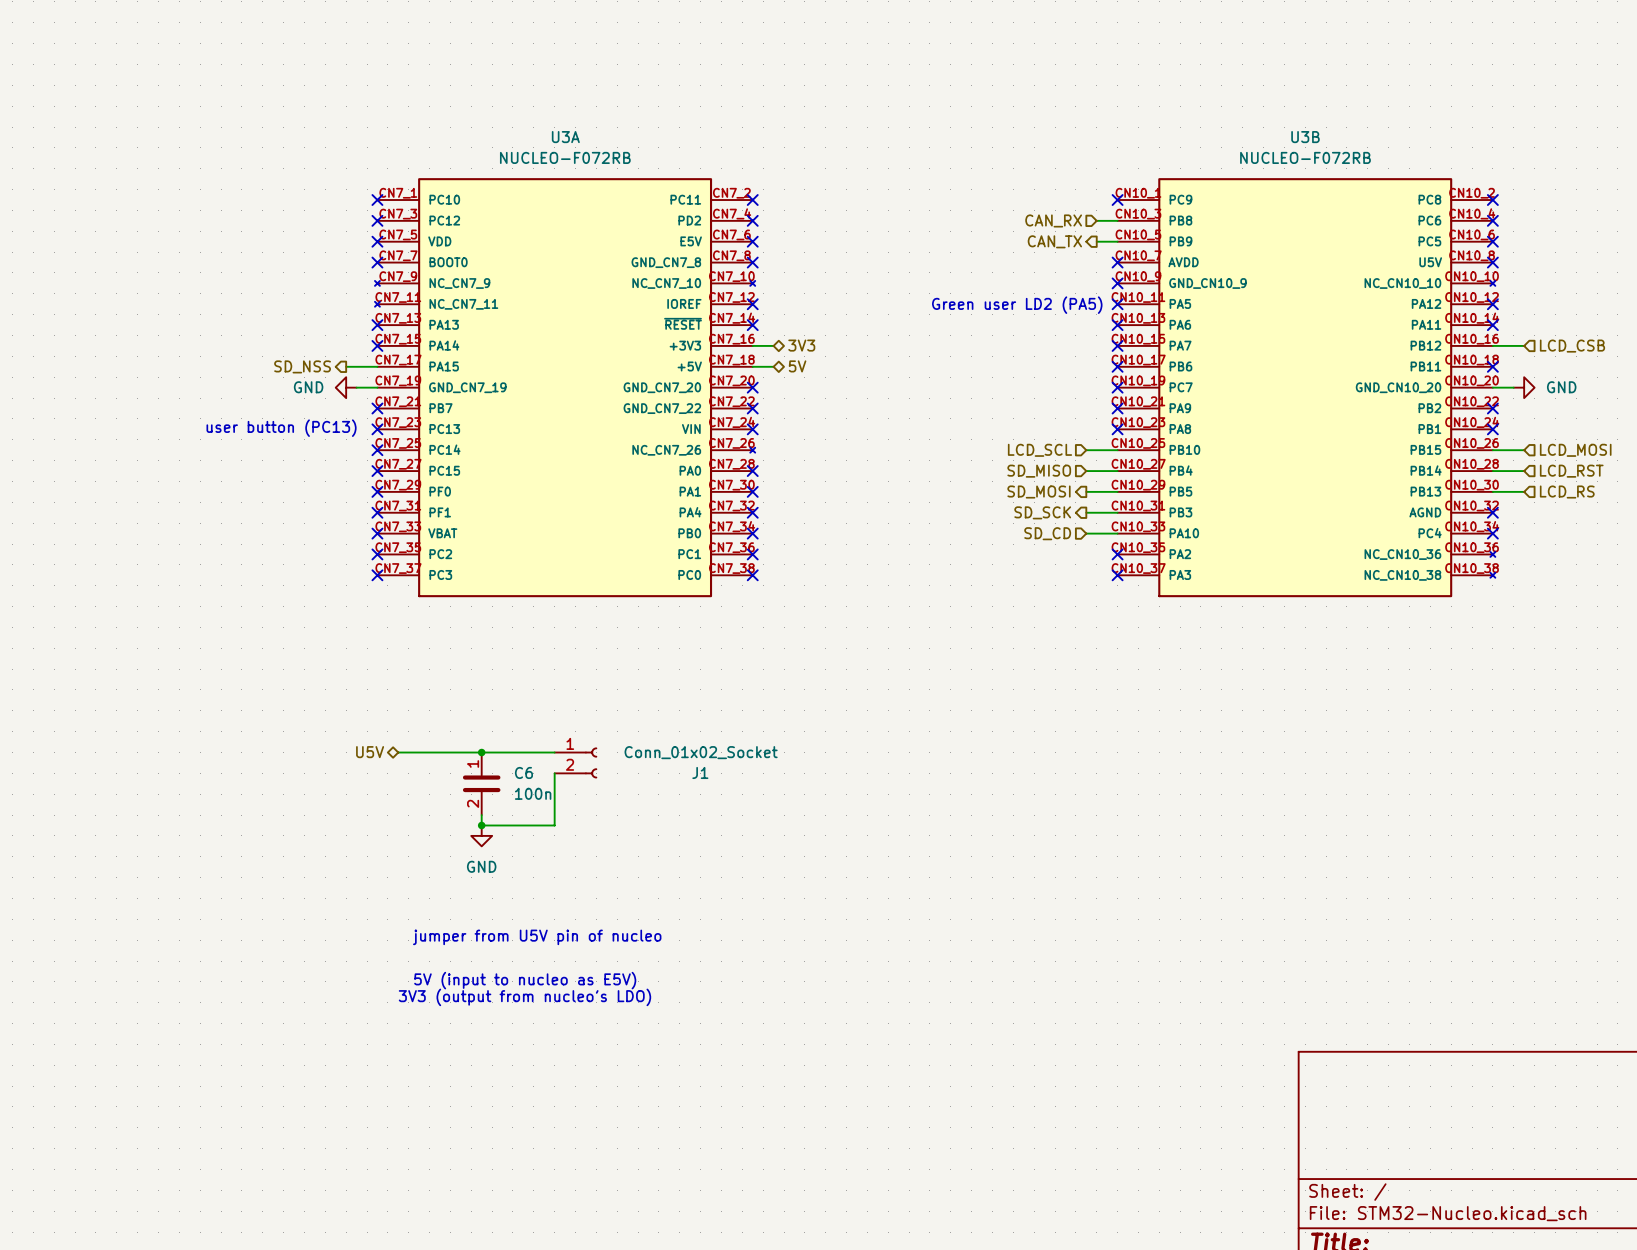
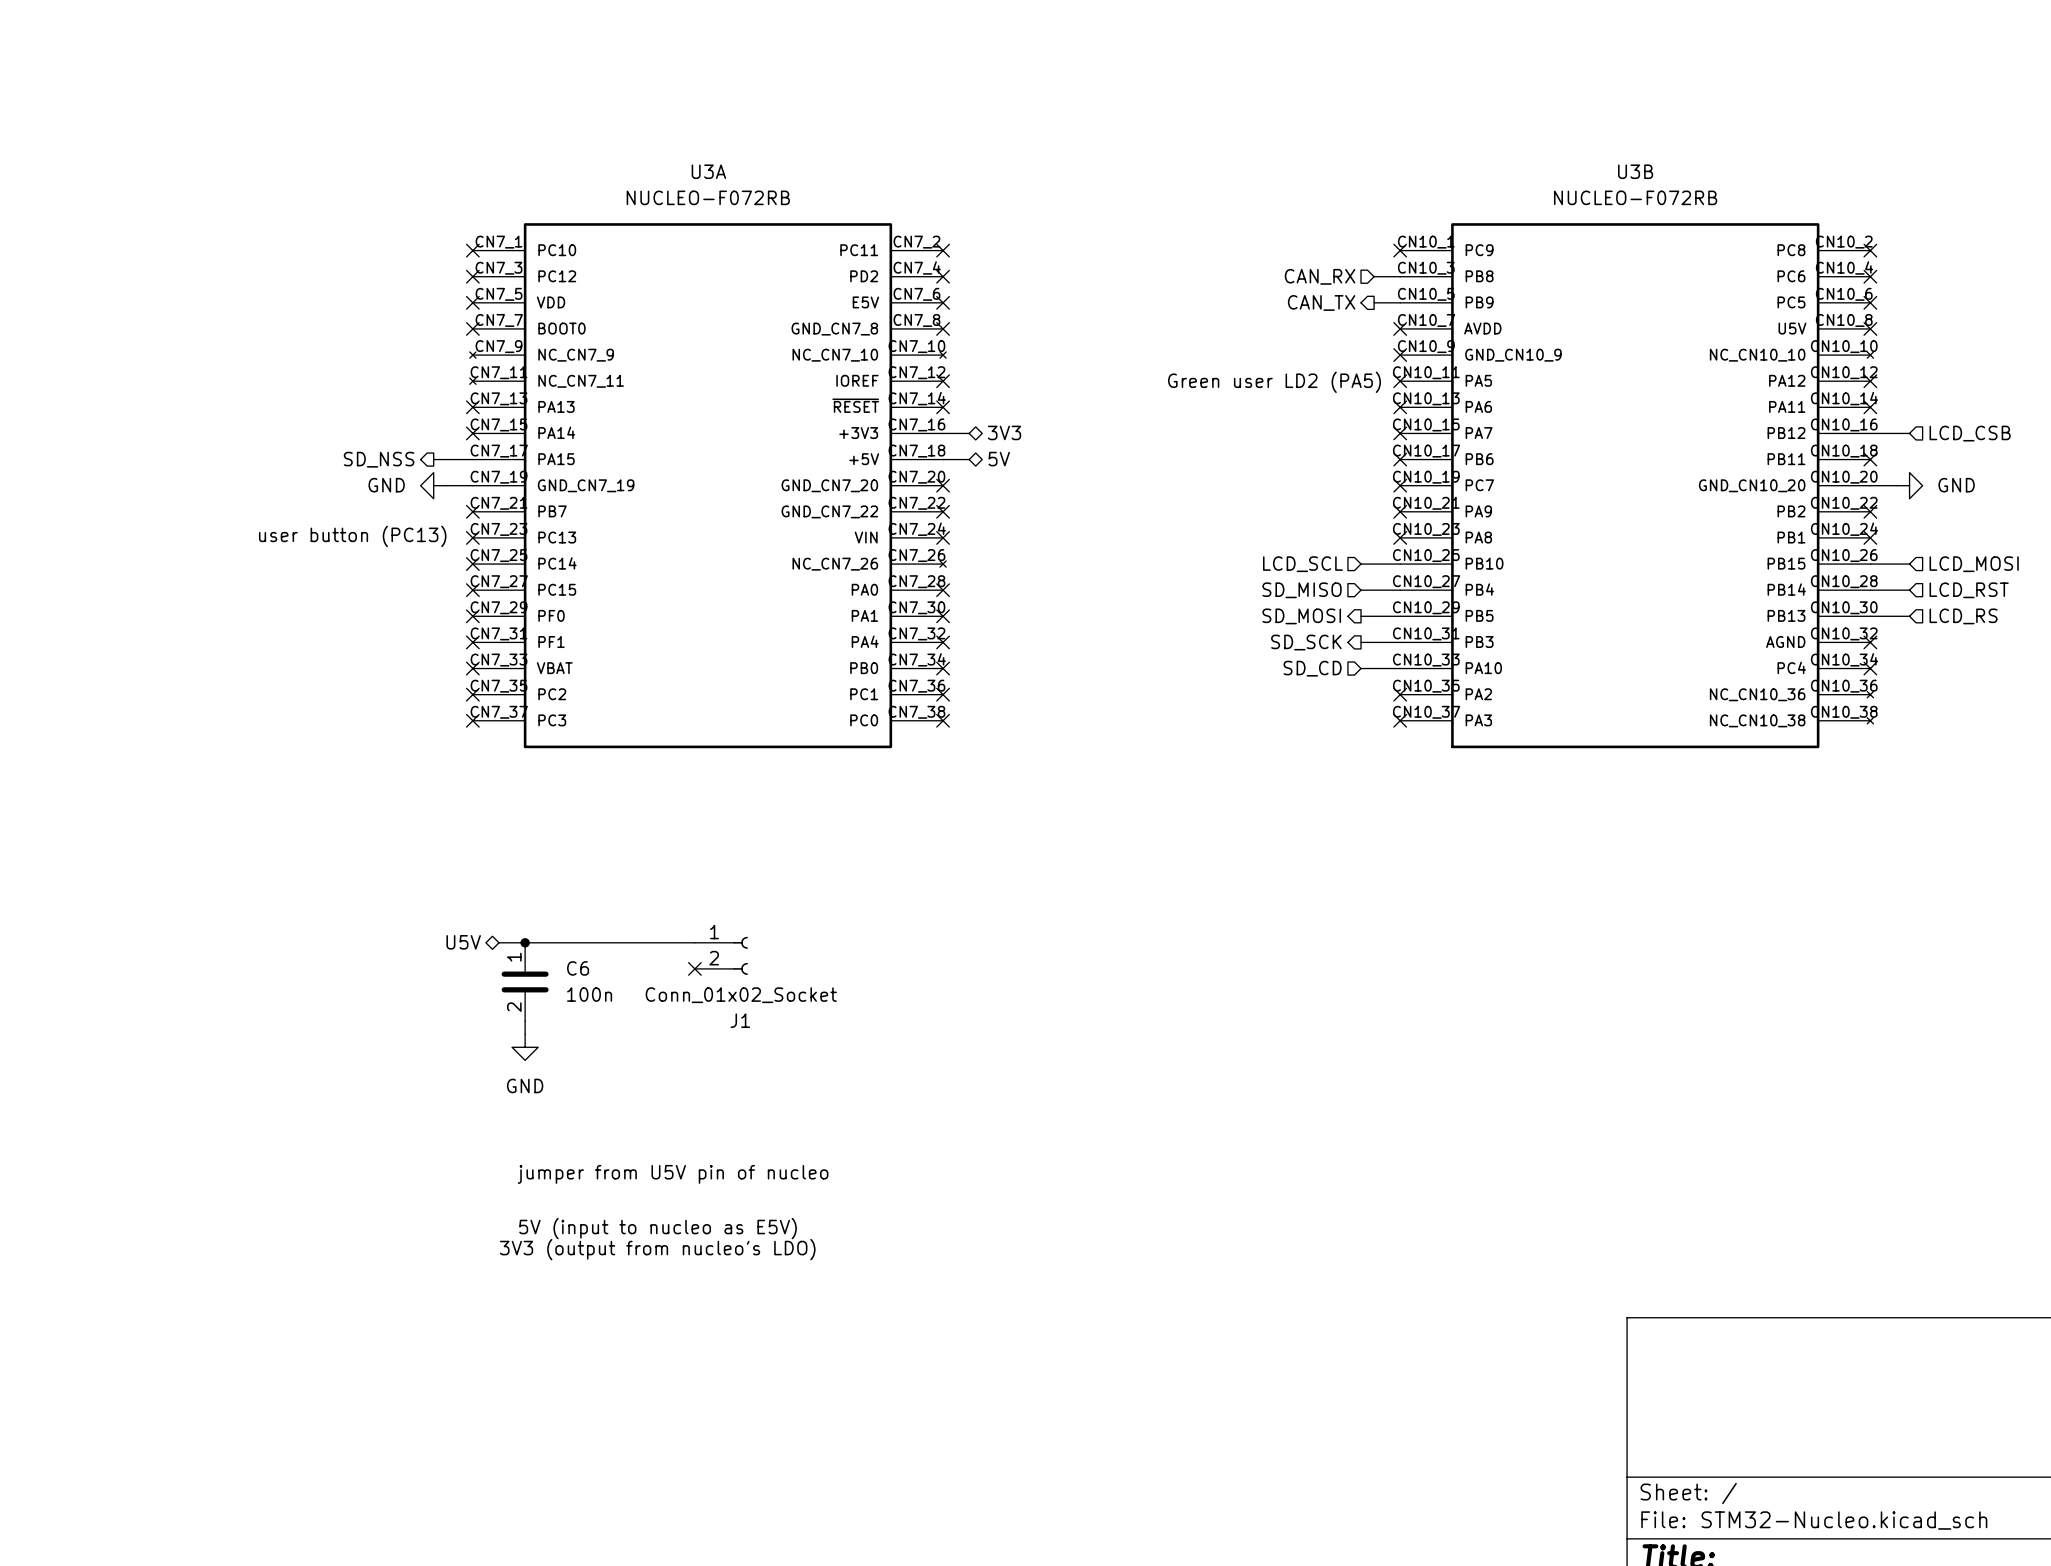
junction: none -> (525, 942)
junction: (481, 752) -> none
J1 value position: Conn_01x02_Socket (701, 752) -> Conn_01x02_Socket (741, 995)
J1 name position: J1 (700, 772) -> J1 (740, 1020)
wire: (554, 773) (554, 825) (481, 825) (481, 815) -> none
no-connect mark: none -> (694, 968)
C6 position: (481, 783) -> (525, 981)
wire: none -> (525, 1021) (525, 1034)
junction: (481, 825) -> none
power symbol position: GND (481, 835) -> GND (525, 1047)

